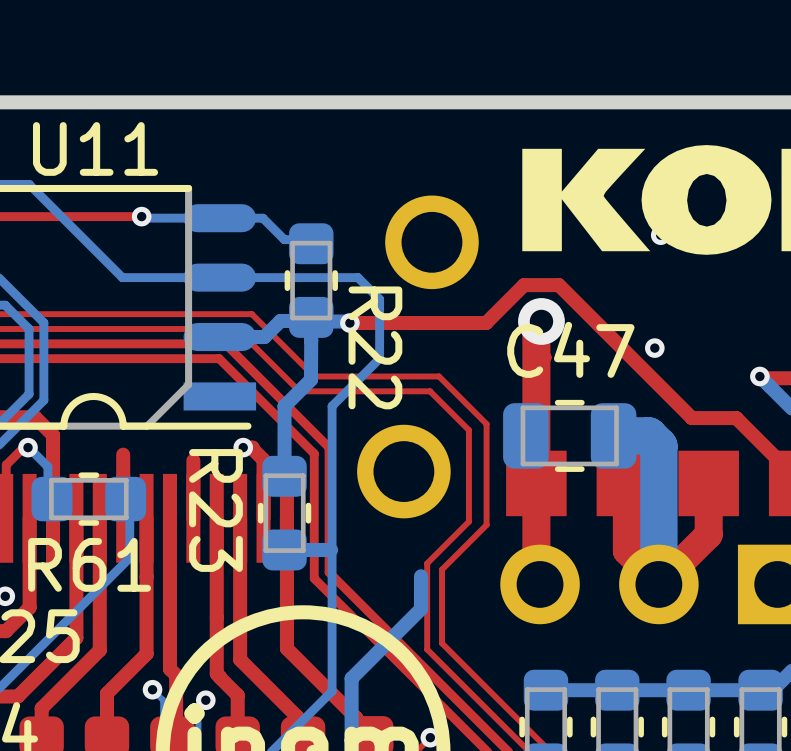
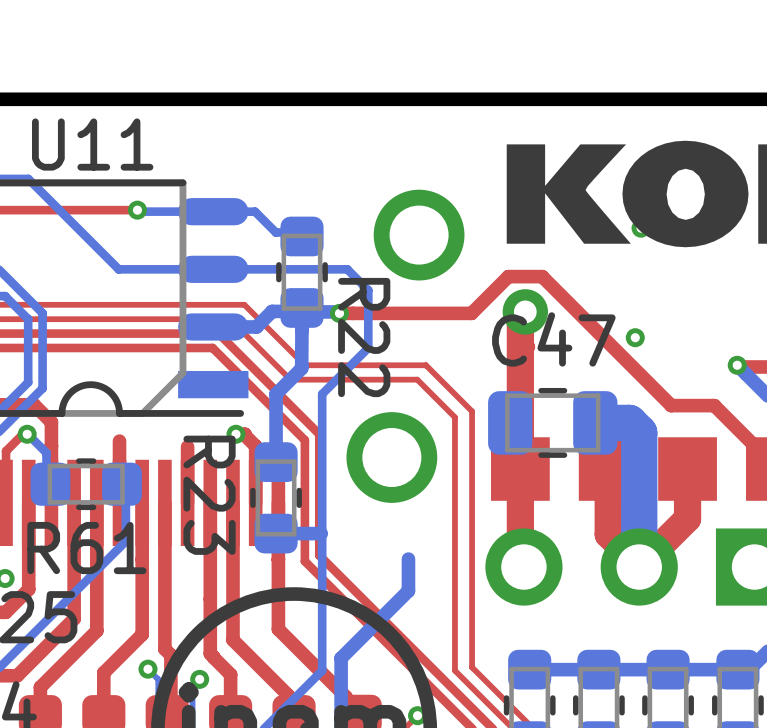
top track: (468, 521) (427, 563) (427, 649) (468, 691) -> (454, 506) (454, 670)
top track: (486, 525) (442, 569) (442, 643) (486, 687) -> (472, 509) (472, 667)

